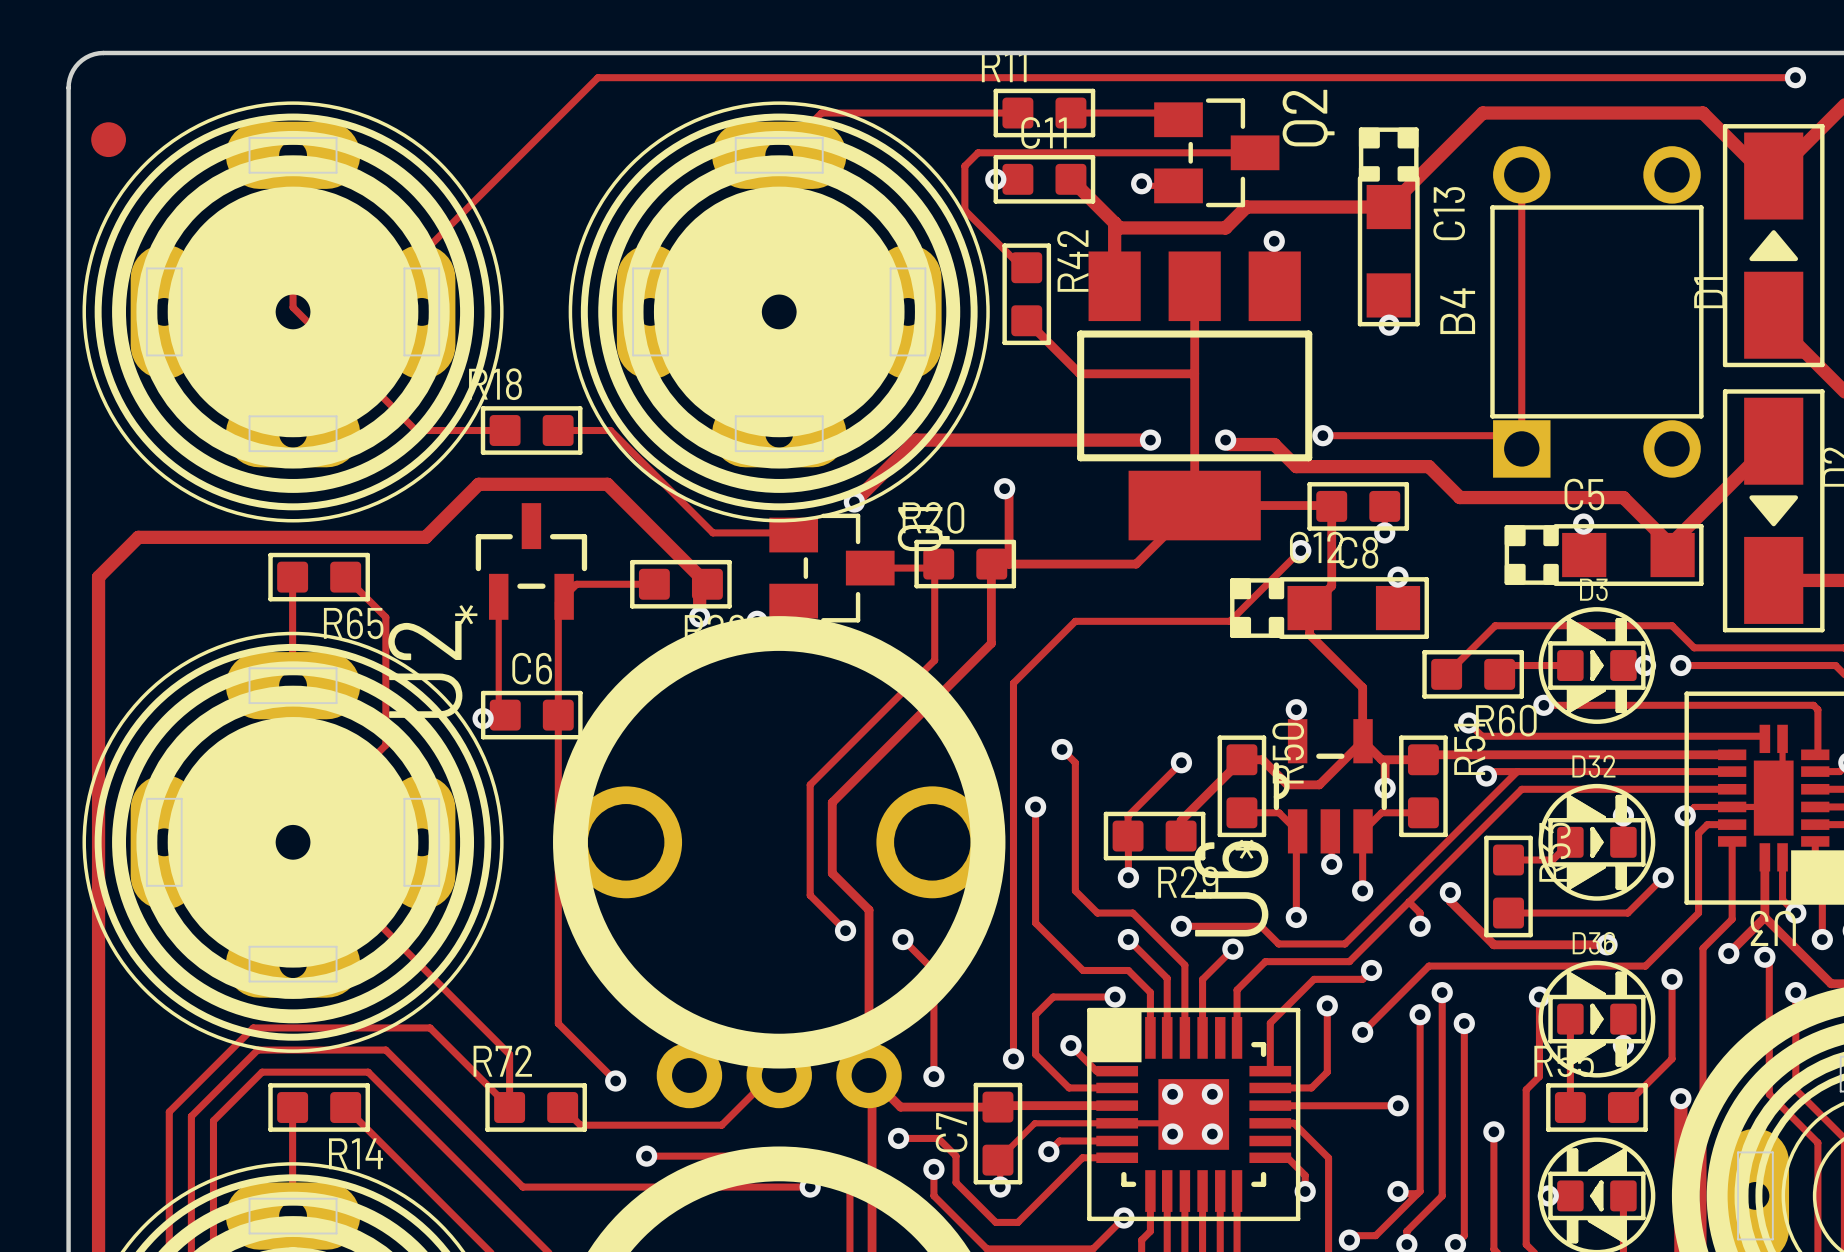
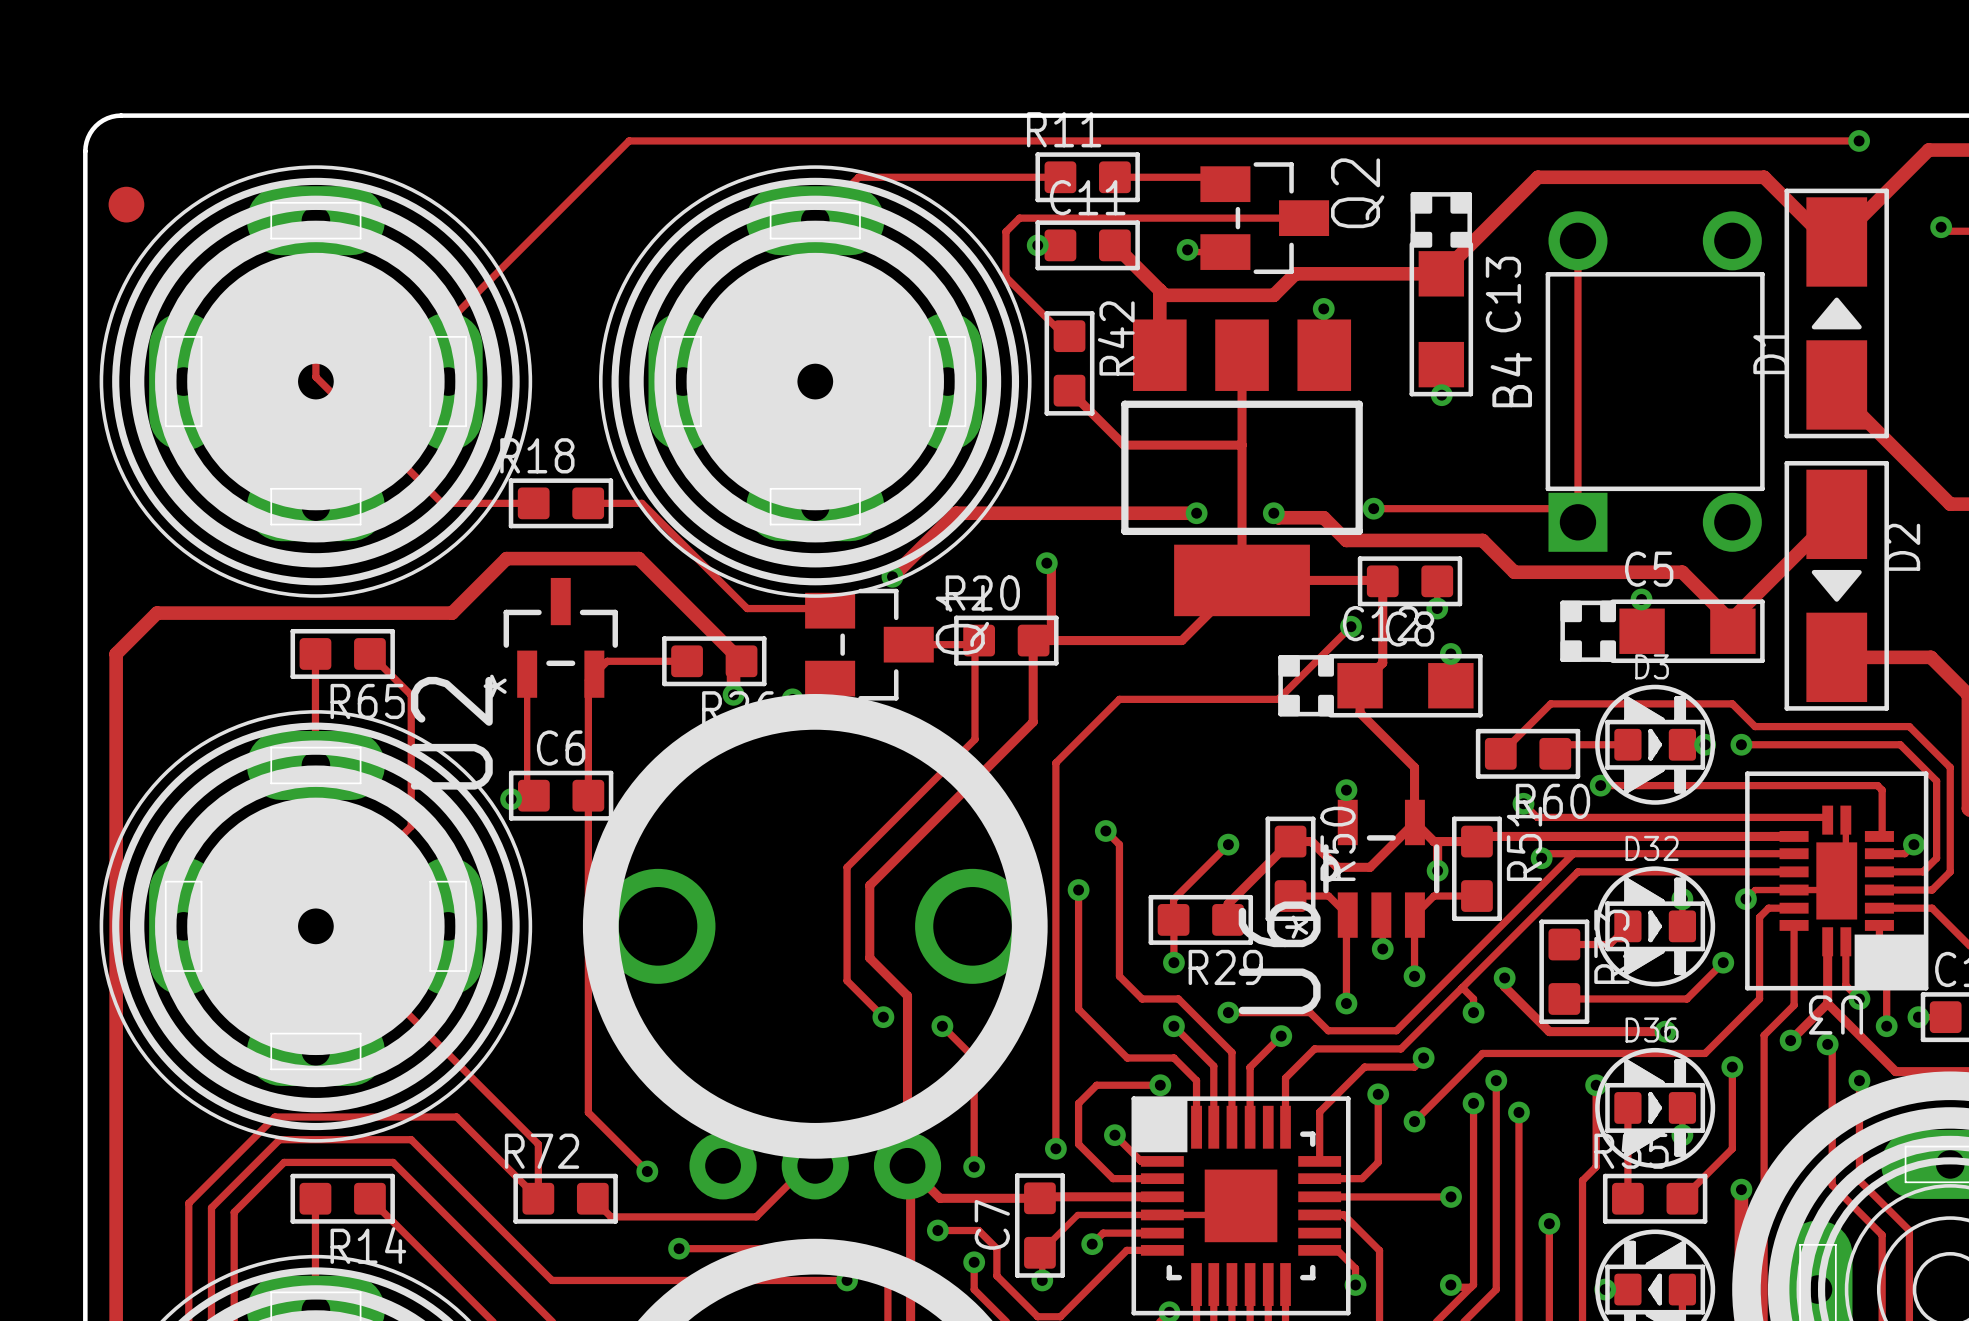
via: (1172, 1094) -> none
via: (1212, 1094) -> none
via: (1172, 1134) -> none
via: (1212, 1134) -> none

